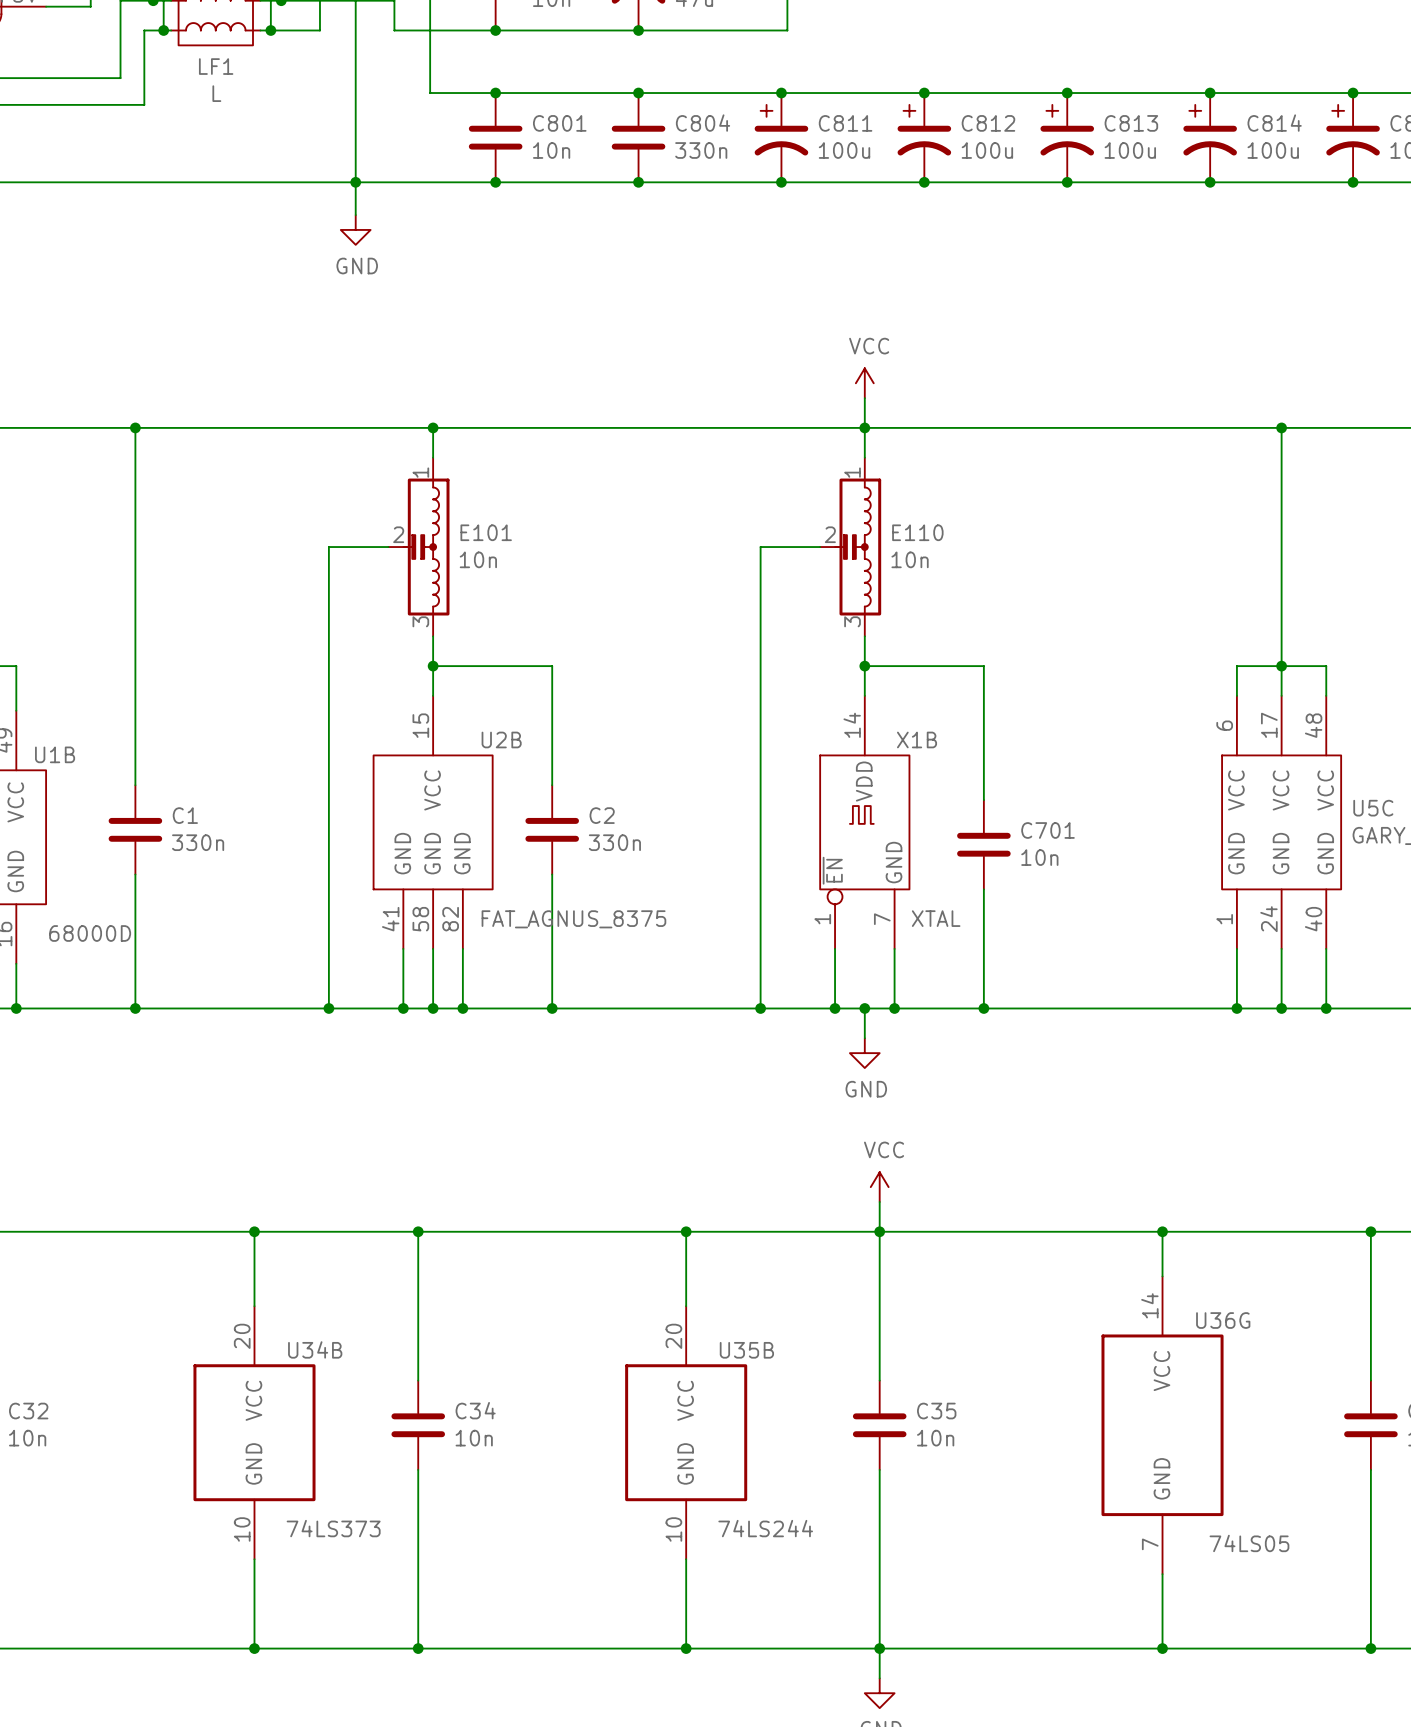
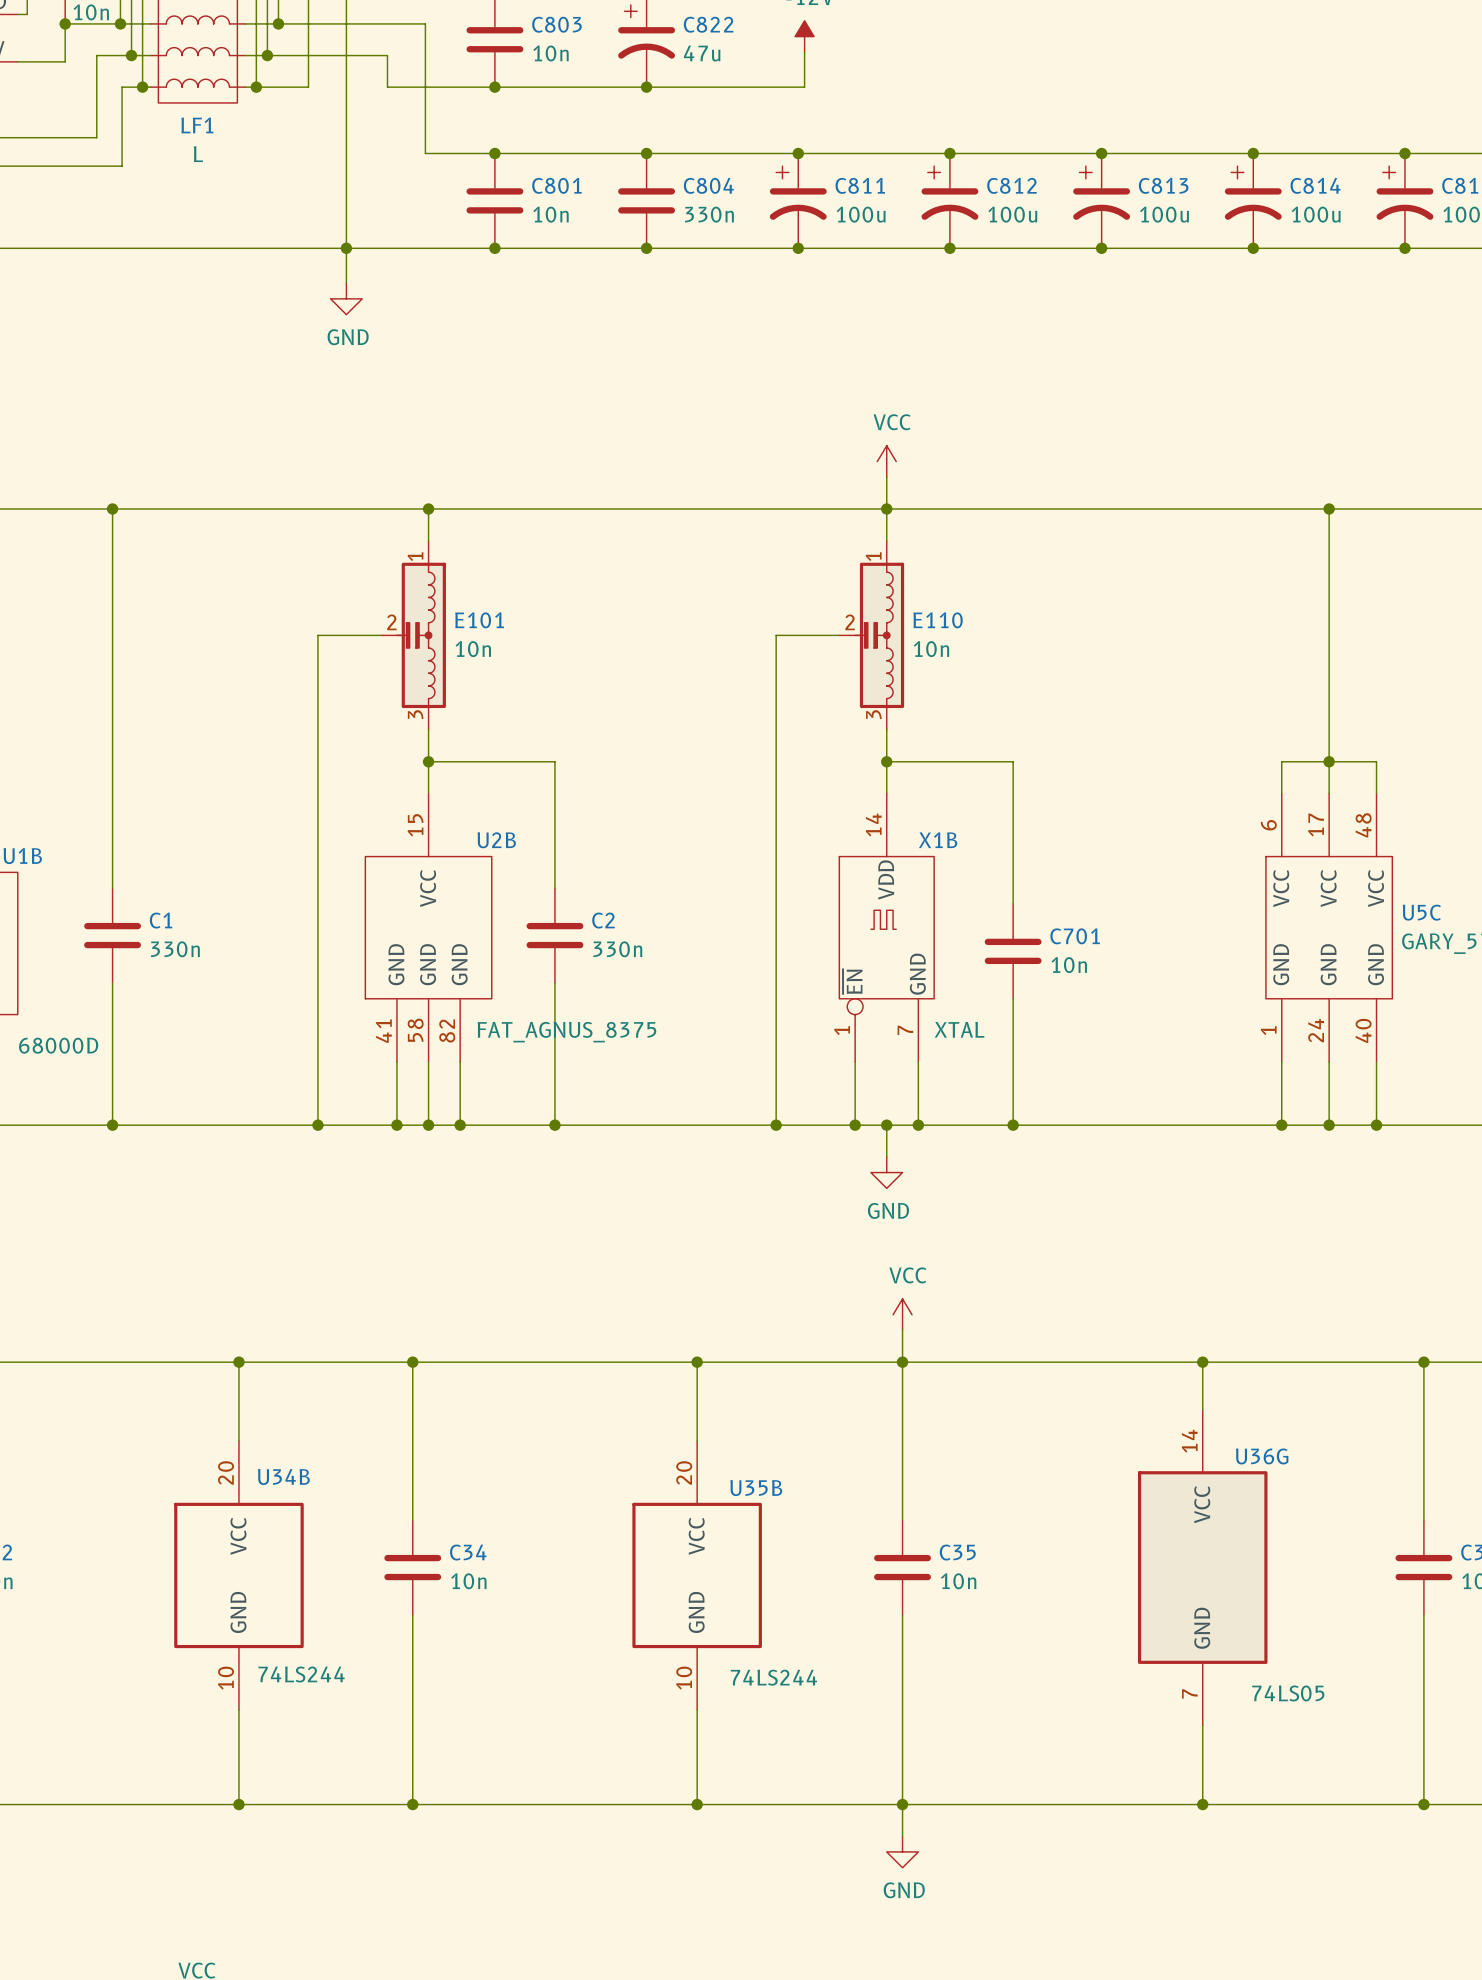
U34B name position: U34B (315, 1349) -> U34B (283, 1476)
U34B value: 74LS373 (333, 1528) -> 74LS244 (301, 1674)

